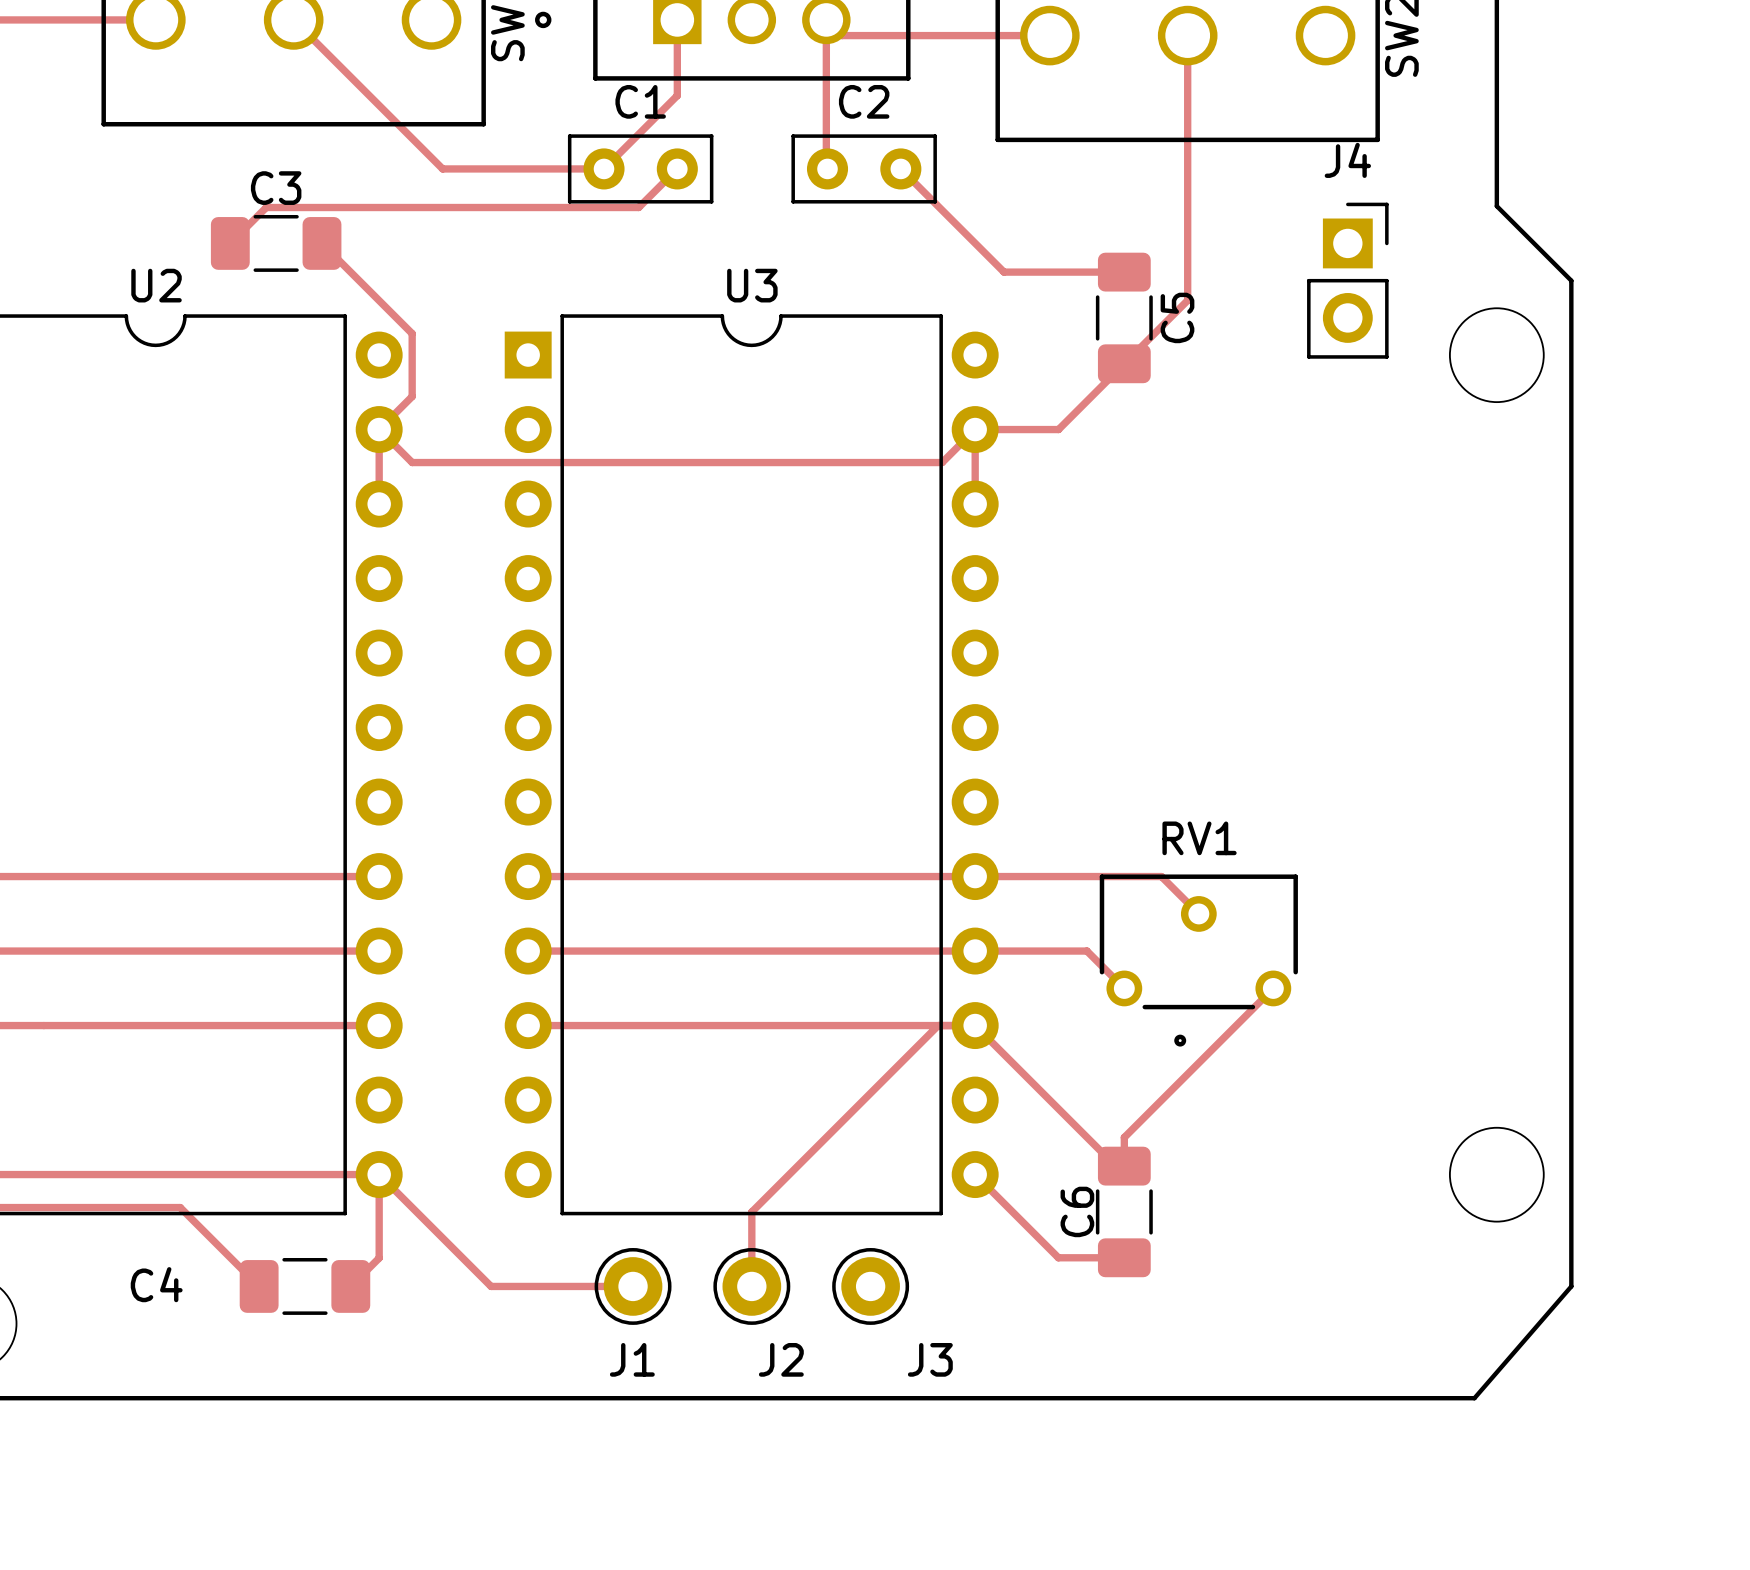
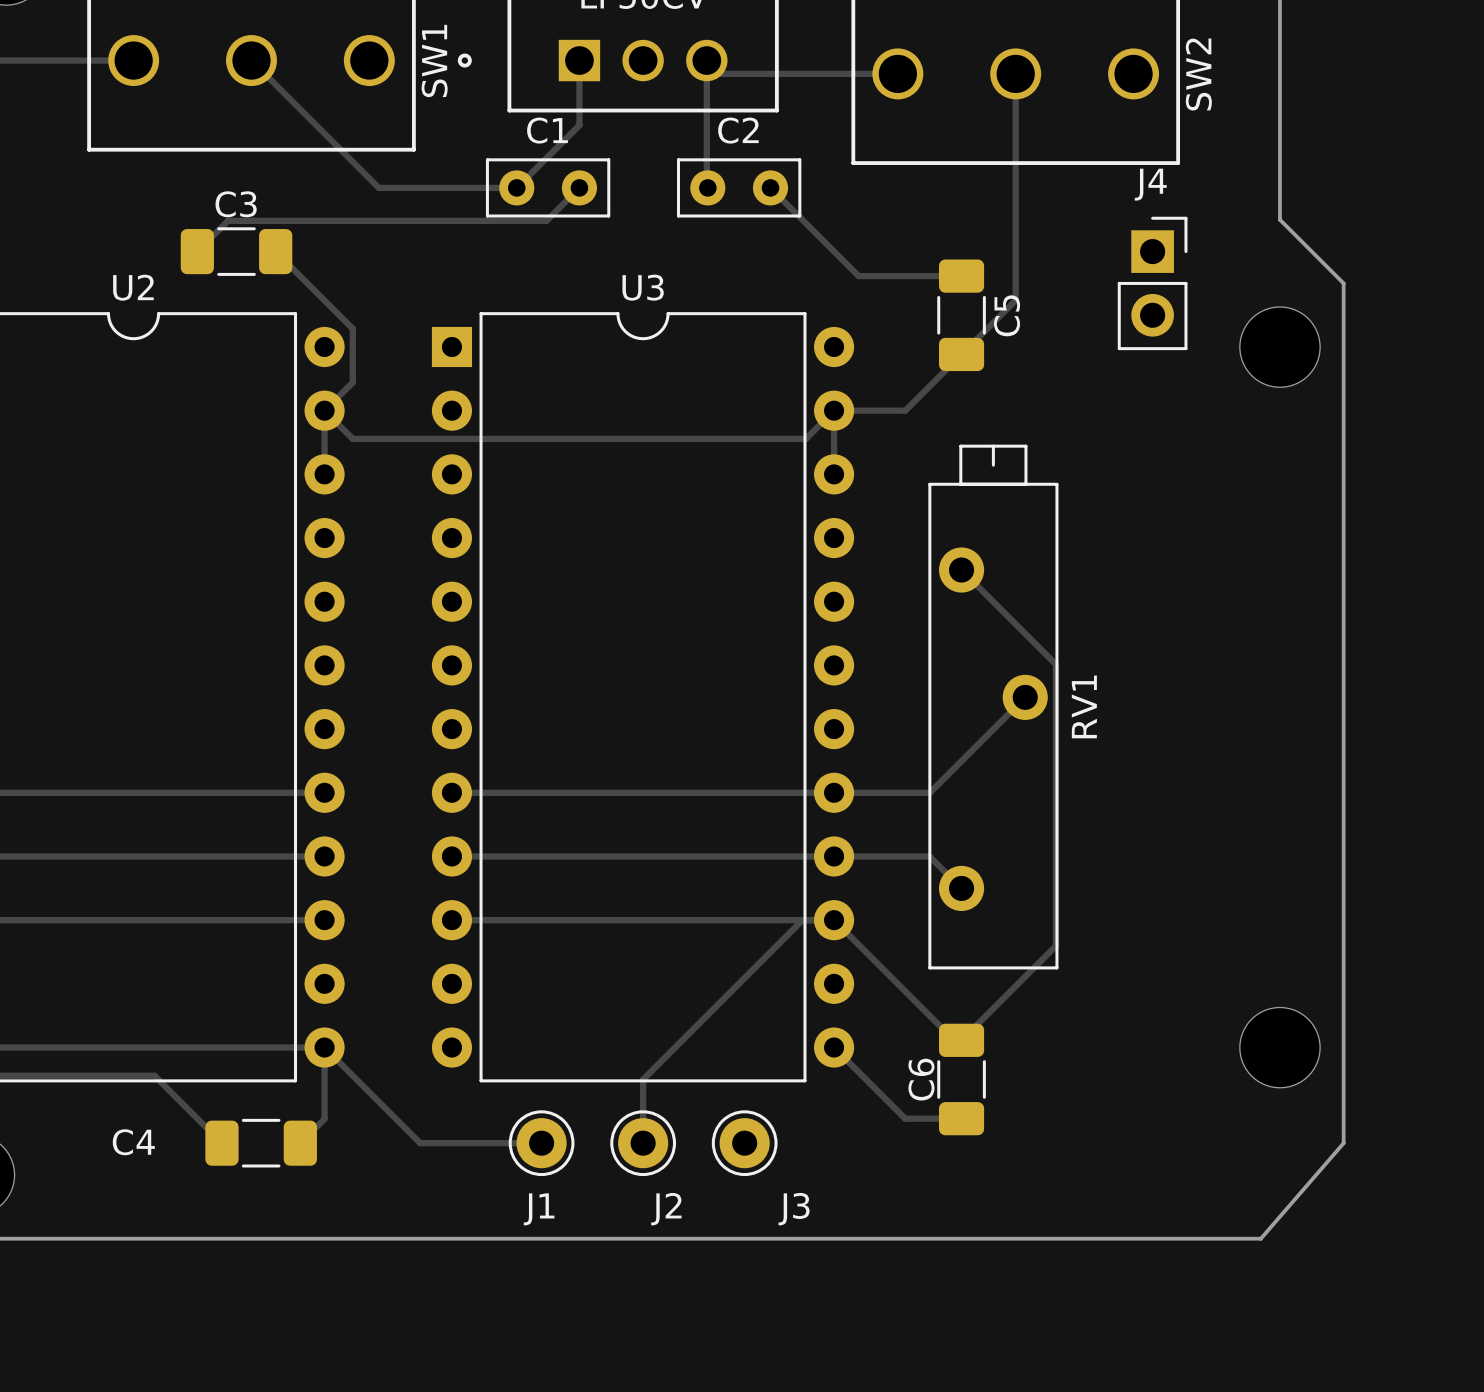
RV1 name position: RV1 (1199, 838) -> RV1 (1084, 706)
RV1 footprint: [1099, 874, 1298, 1047] -> [928, 444, 1059, 970]
track: (1087, 876) (1161, 876) (1198, 913) -> (929, 792) (1025, 697)
track: (1273, 988) (1124, 1137) (1124, 1166) -> (961, 570) (1055, 664) (1055, 945) (961, 1040)

